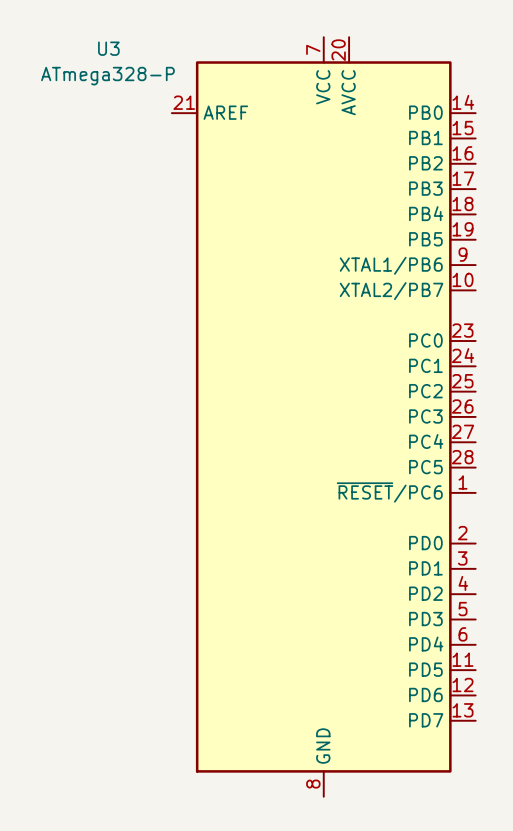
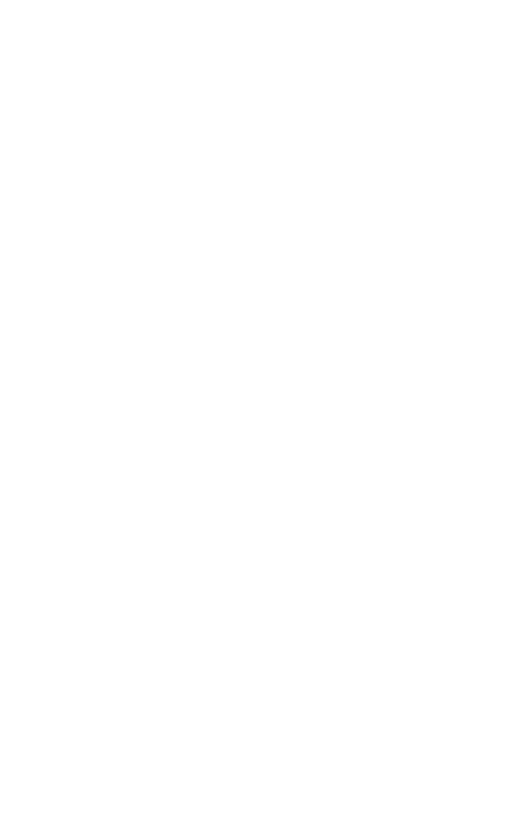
U3: ATmega328-P (323, 416) -> none

